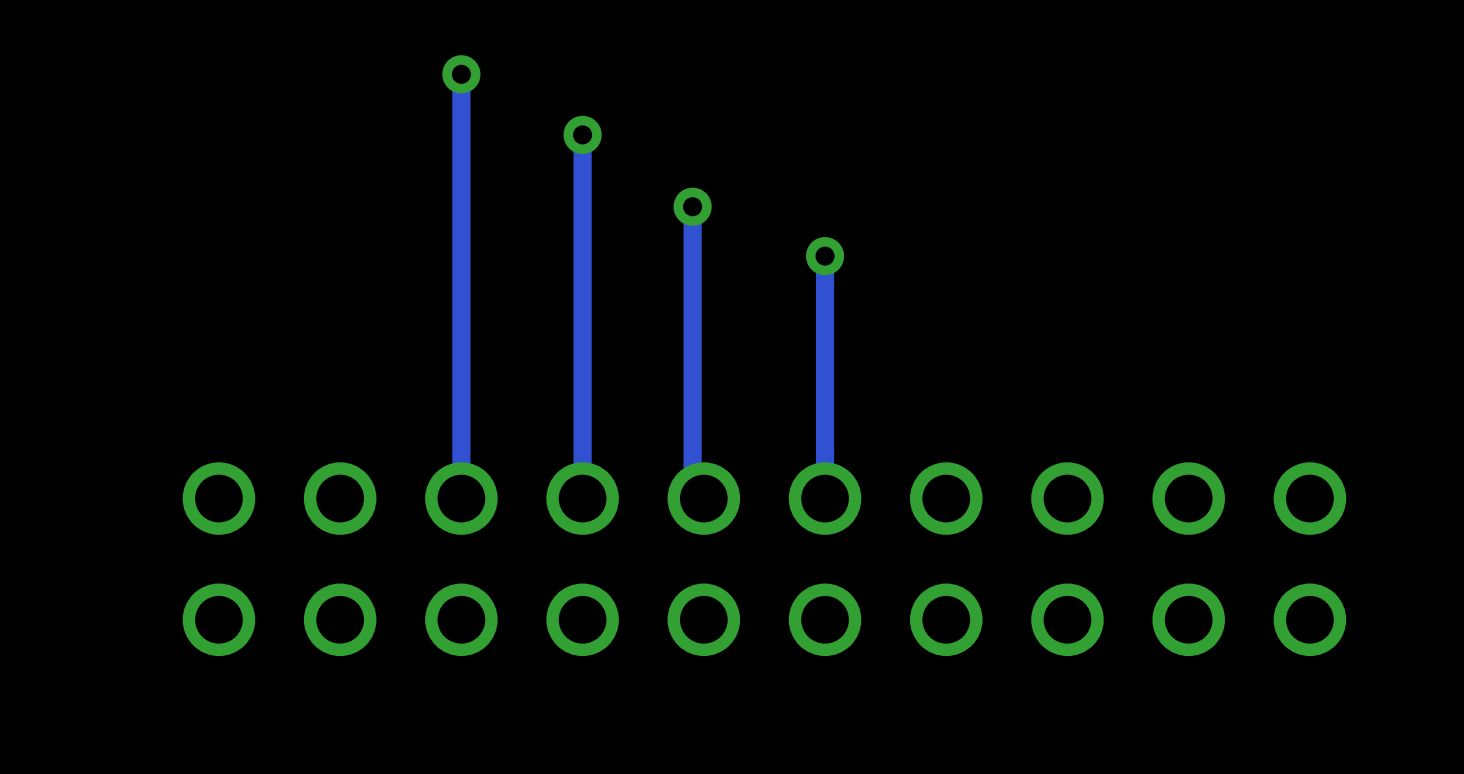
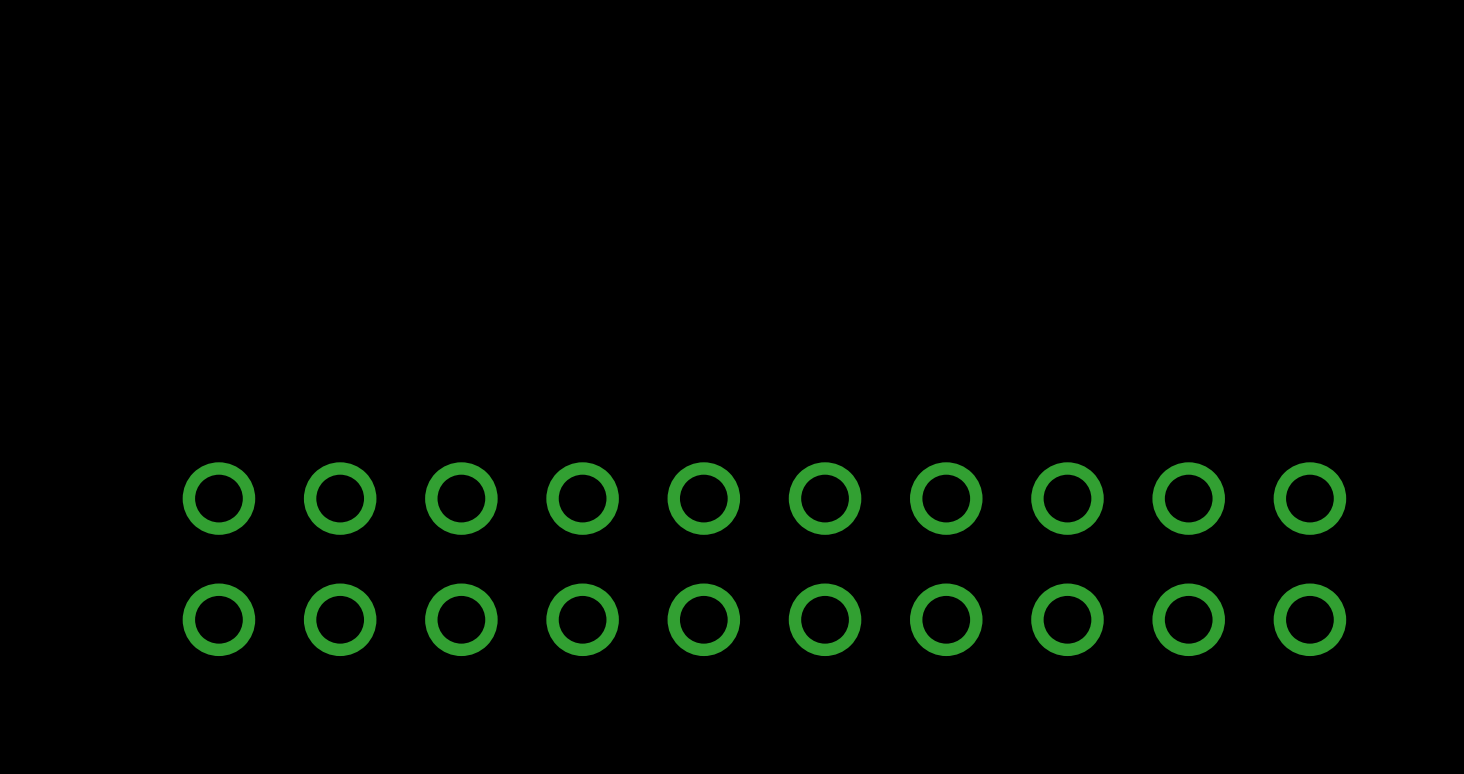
track: (461, 74) (461, 498) -> none
via: (461, 74) -> none
track: (582, 134) (582, 498) -> none
via: (582, 134) -> none
track: (692, 206) (692, 487) (703, 498) -> none
via: (692, 206) -> none
track: (825, 256) (825, 498) -> none
via: (825, 256) -> none

